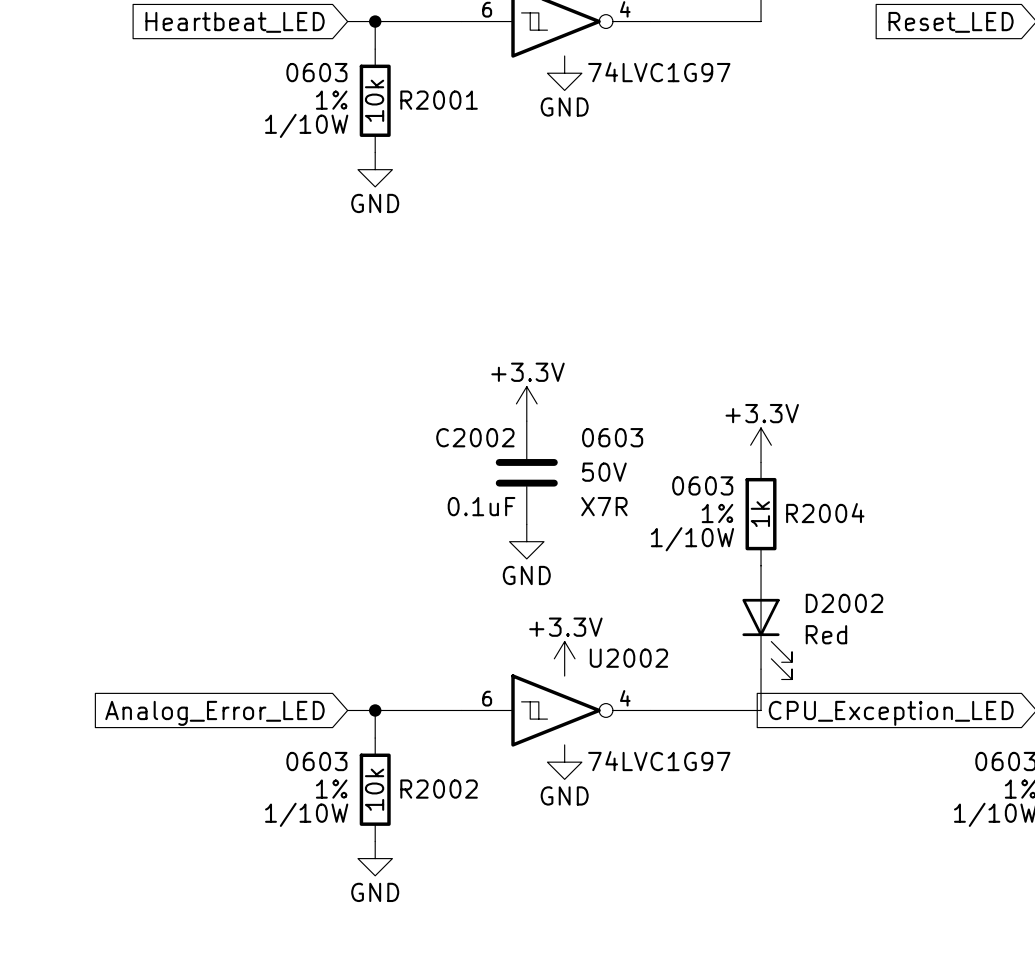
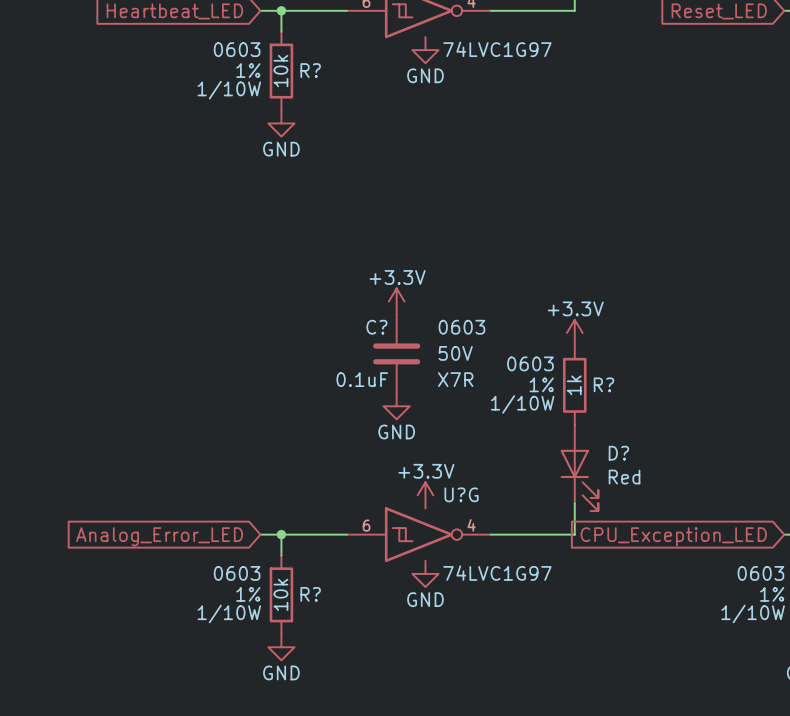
R2001 name: R2001 (439, 100) -> R? (310, 70)
C2002 name: C2002 (475, 437) -> C? (376, 327)
R2004 name: R2004 (825, 513) -> R? (603, 384)
D2002 name: D2002 (844, 603) -> D? (618, 453)
U2002 name: U2002 (628, 658) -> U?G (461, 494)
R2002 name: R2002 (439, 789) -> R? (310, 594)

